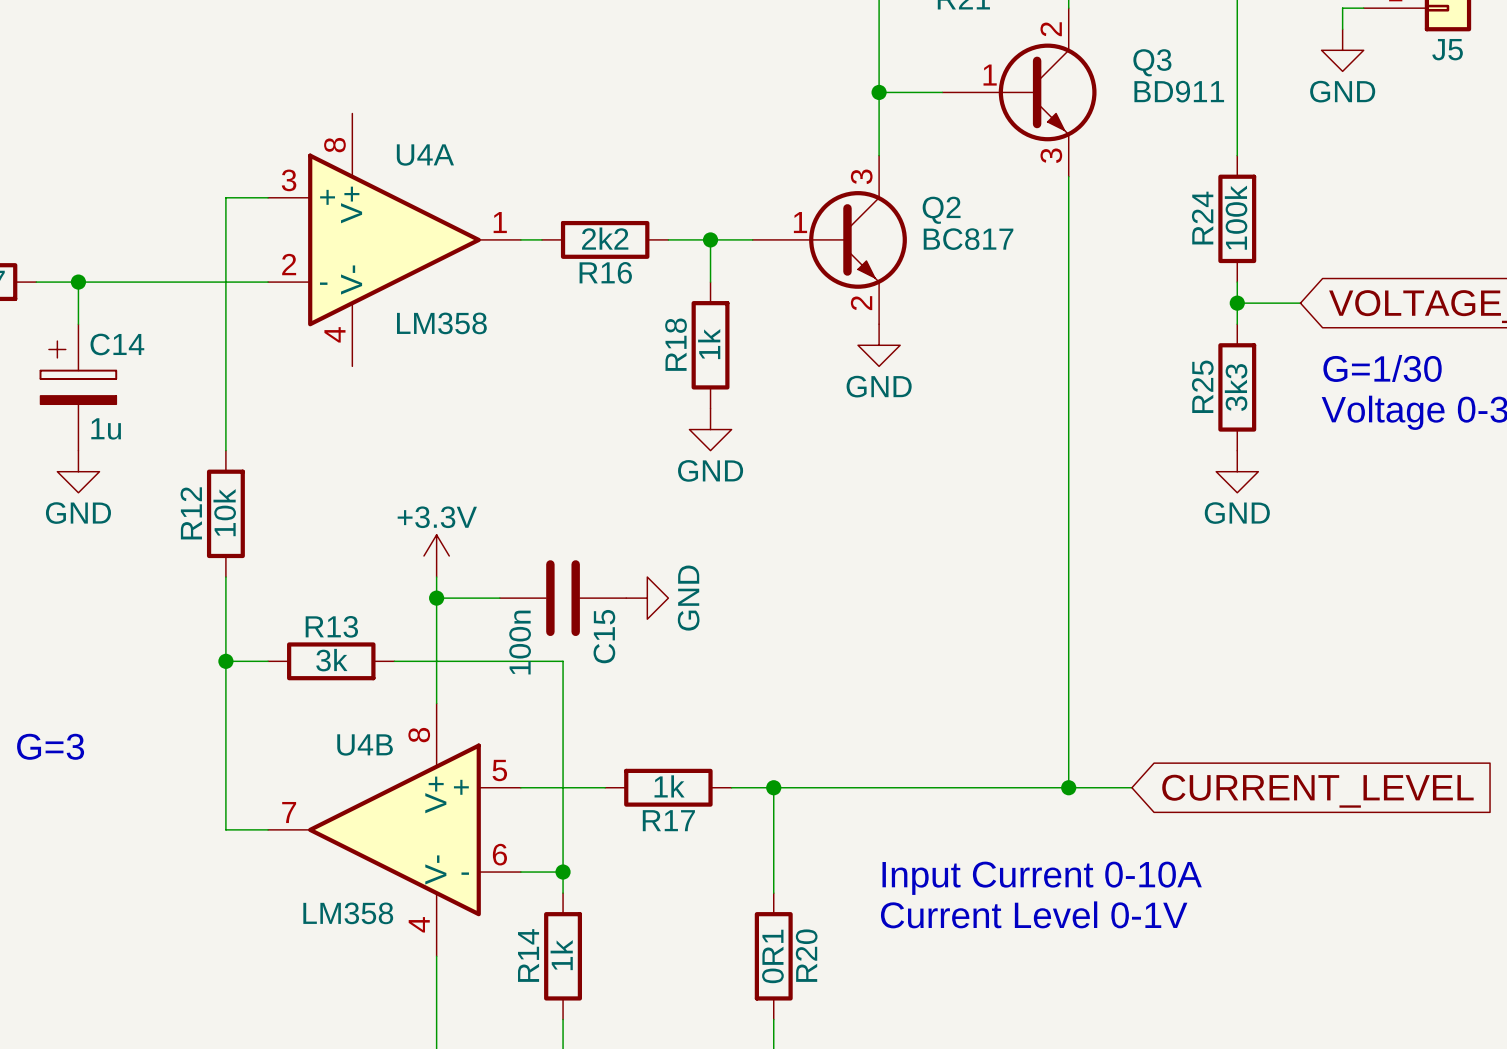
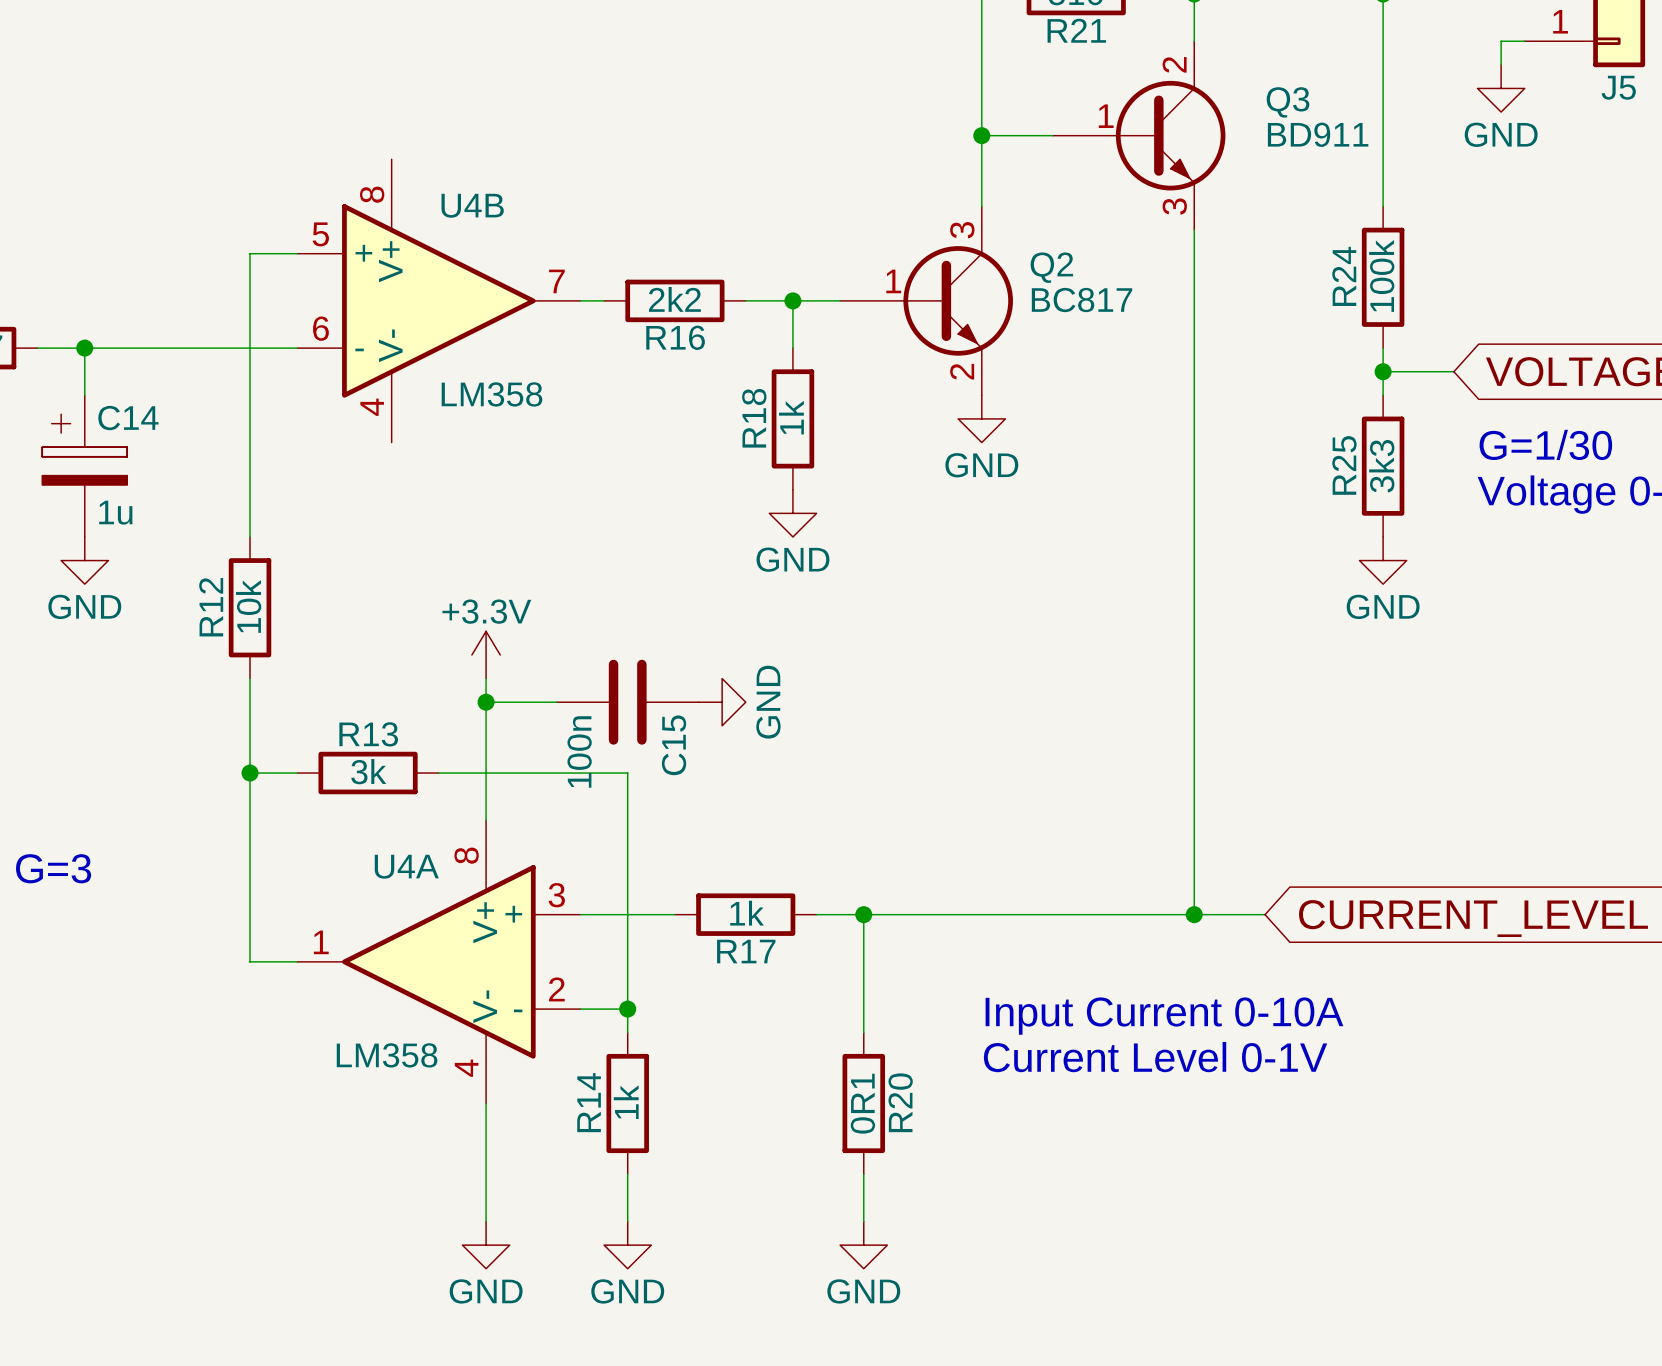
U4A flip: as is (394, 239) -> left-right (438, 961)
U4A position: (394, 239) -> (438, 961)
U4B flip: as is (394, 829) -> left-right (438, 300)
U4B position: (394, 829) -> (438, 300)

